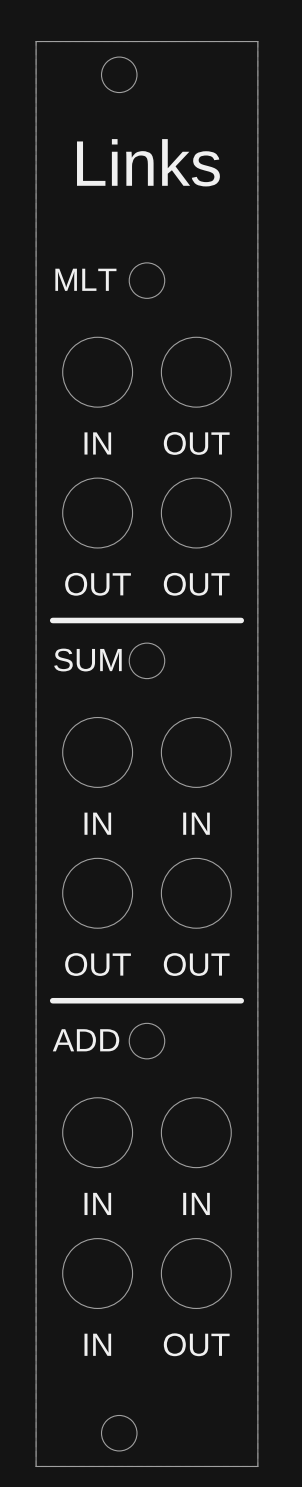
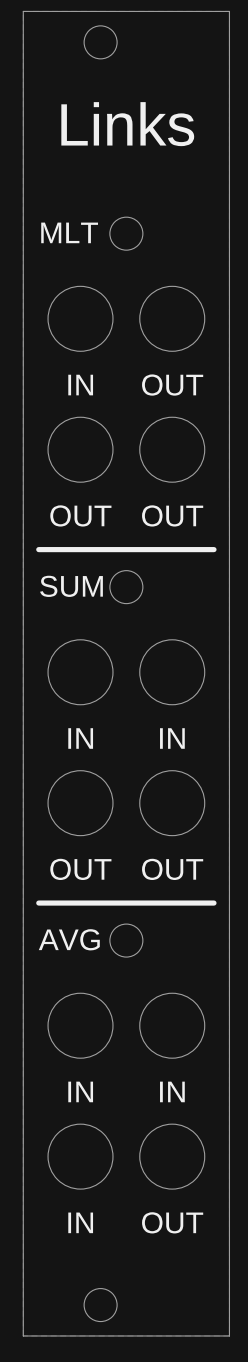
text: ADD (86, 1040) -> AVG (69, 939)

